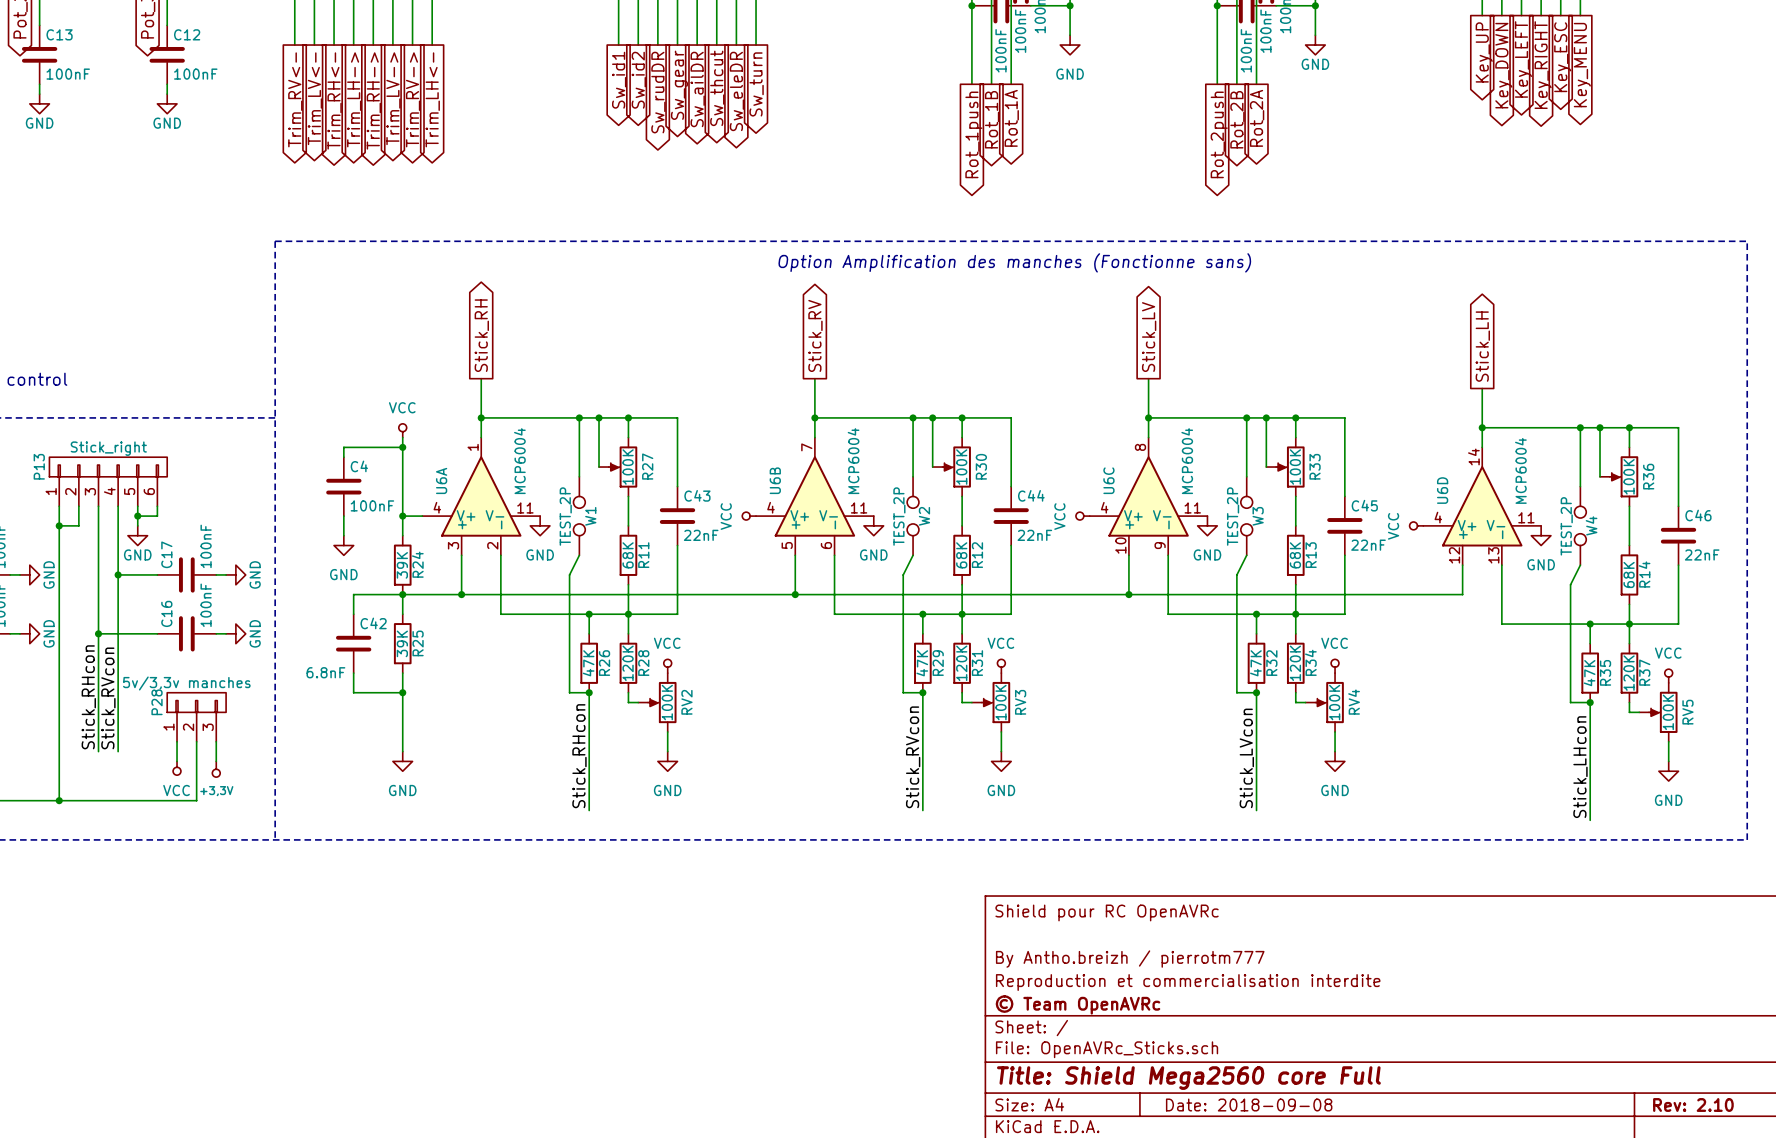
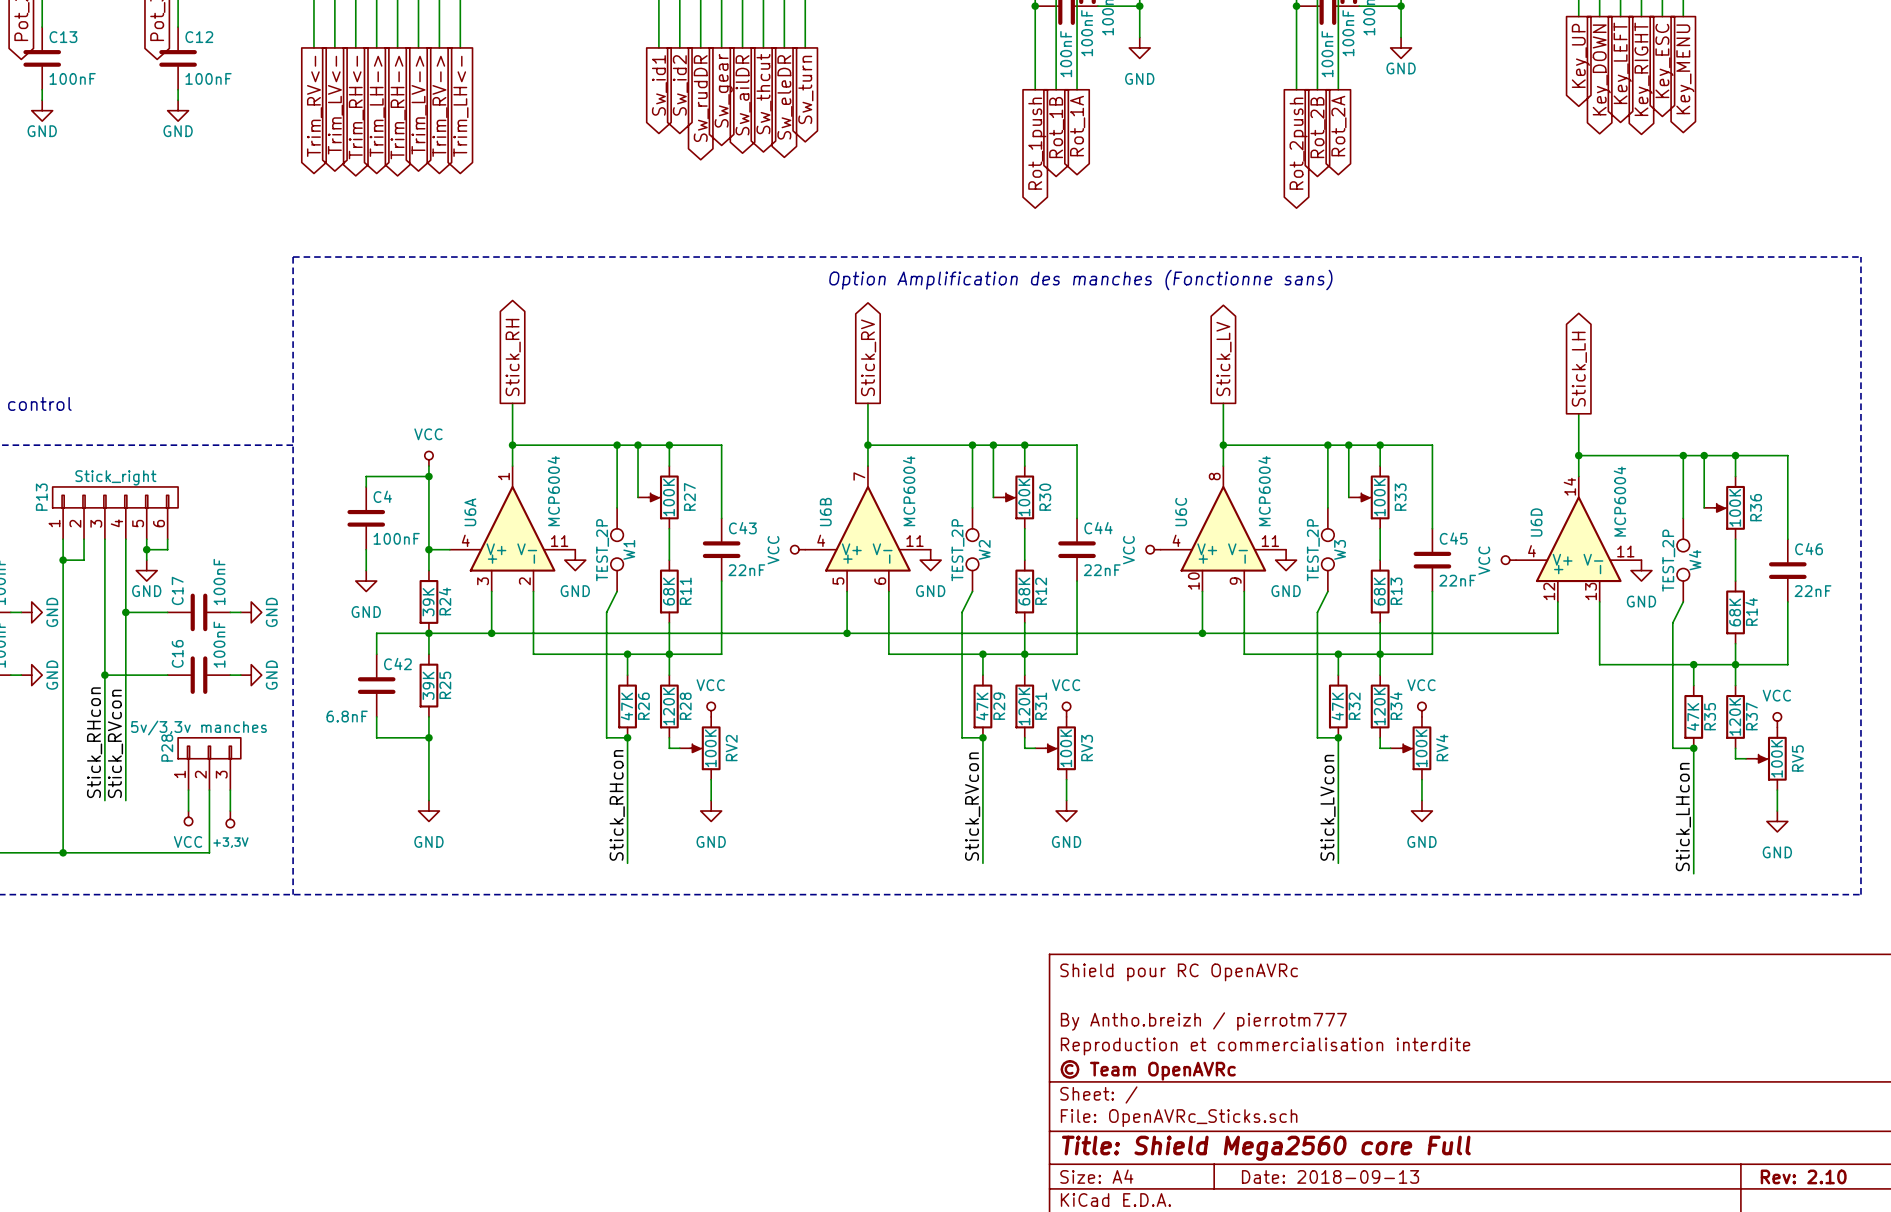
title block: Date: 2018-09-08 (1249, 1104) -> Date: 2018-09-13 (1330, 1176)

